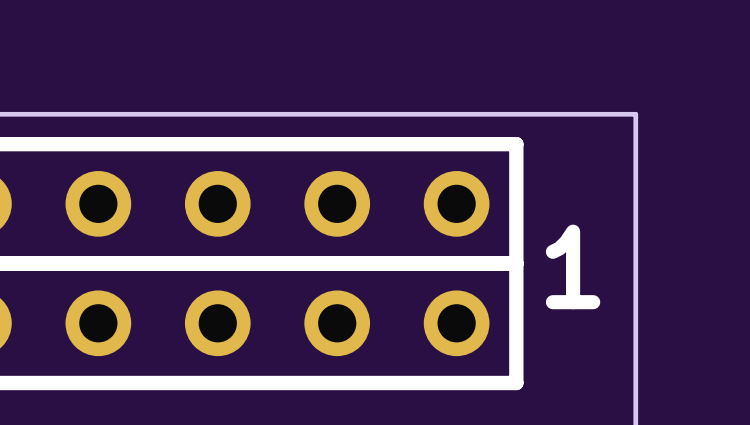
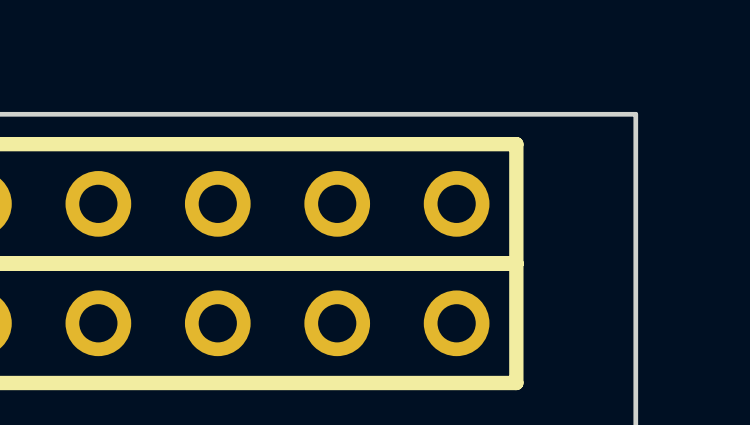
text: 1 (573, 266) -> none

